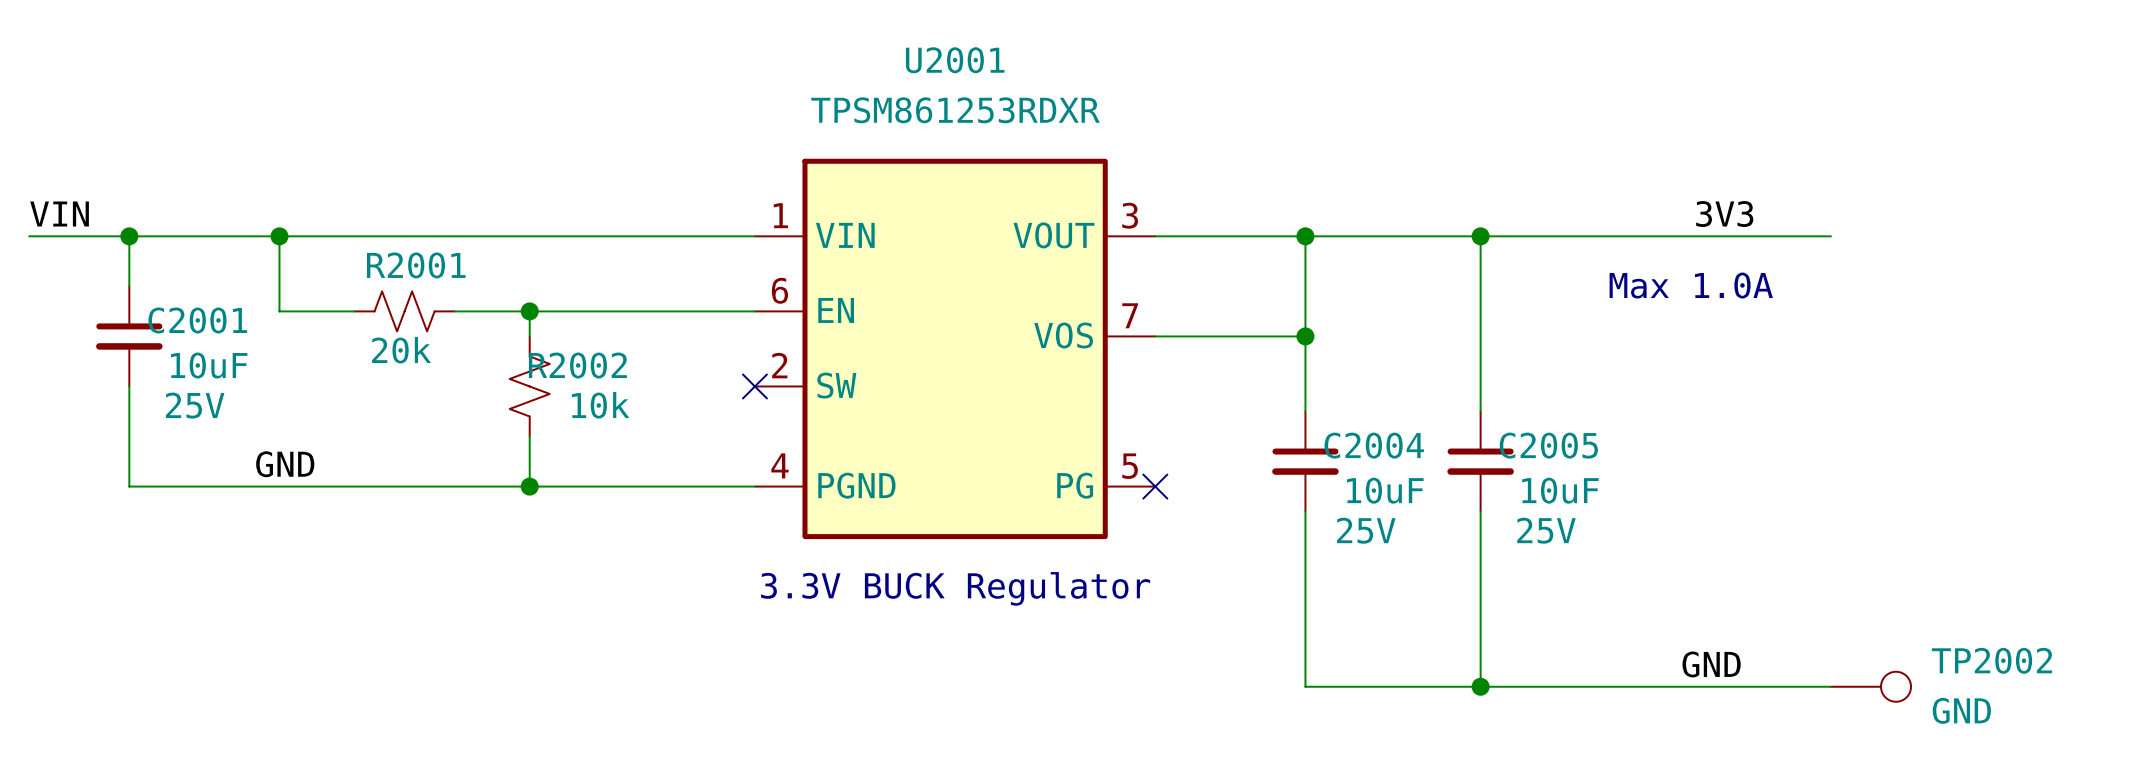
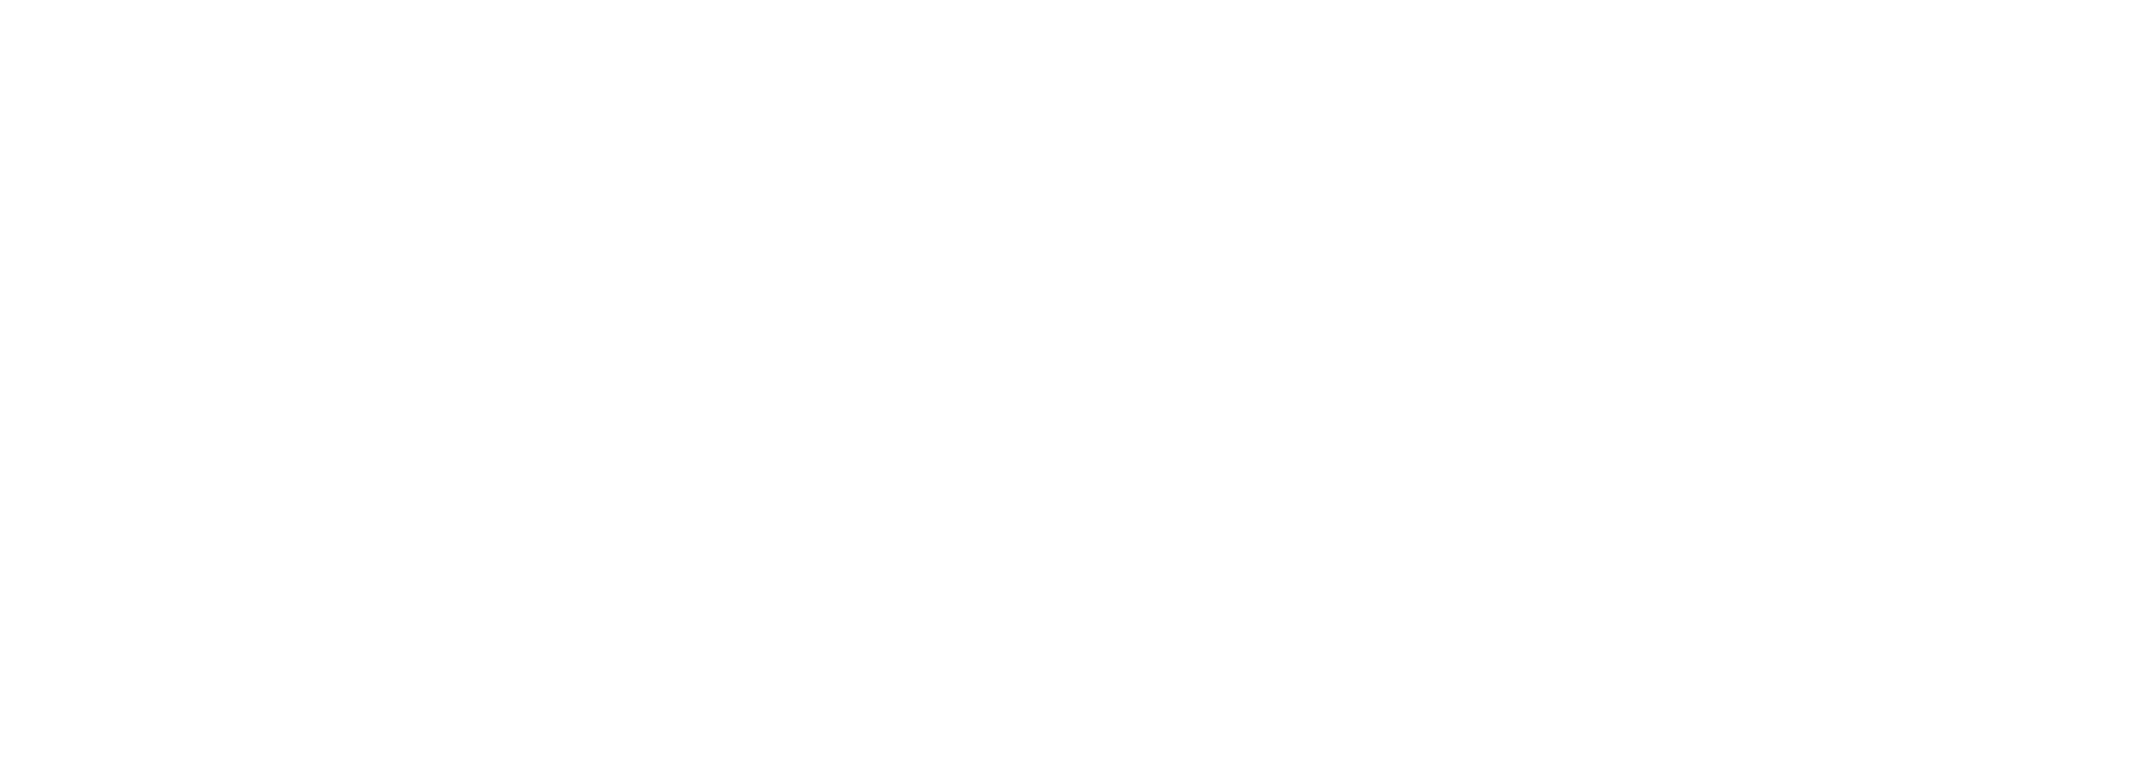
label: VIN (59, 214) -> none
label: 3V3 (1724, 214) -> none
wire: (29, 236) (754, 236) -> none
wire: (129, 236) (129, 286) -> none
junction: (129, 236) -> none
wire: (279, 236) (279, 311) (354, 311) -> none
junction: (279, 236) -> none
wire: (1155, 236) (1830, 236) -> none
wire: (1305, 236) (1305, 411) -> none
junction: (1305, 236) -> none
wire: (1480, 236) (1480, 411) -> none
junction: (1480, 236) -> none
text: Max 1.0A (1691, 285) -> none
R2001: 20k (404, 311) -> none
wire: (454, 311) (754, 311) -> none
wire: (529, 311) (529, 336) -> none
junction: (529, 311) -> none
C2001: 10uF (129, 336) -> none
wire: (1155, 336) (1305, 336) -> none
junction: (1305, 336) -> none
U2001: TPSM861253RDXR (955, 348) -> none
wire: (129, 386) (129, 486) (754, 486) -> none
R2002: 10k (529, 386) -> none
no-connect mark: (754, 386) -> none
wire: (529, 436) (529, 486) -> none
C2004: 10uF (1305, 461) -> none
C2005: 10uF (1480, 461) -> none
label: GND (285, 464) -> none
junction: (529, 486) -> none
no-connect mark: (1155, 486) -> none
wire: (1305, 511) (1305, 686) (1830, 686) -> none
wire: (1480, 511) (1480, 686) -> none
text: 3.3V BUCK Regulator (955, 588) -> none
label: GND (1711, 664) -> none
junction: (1480, 686) -> none
TP2002: GND (1870, 686) -> none

